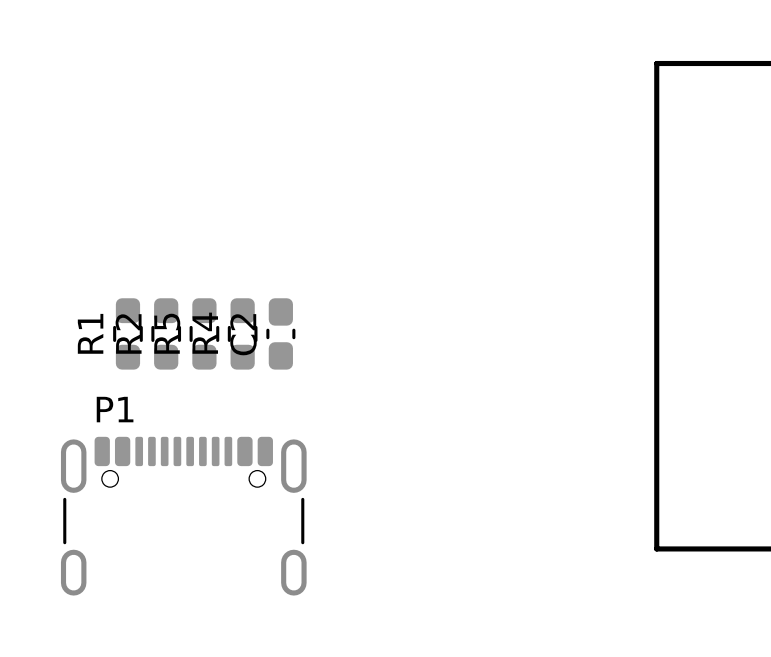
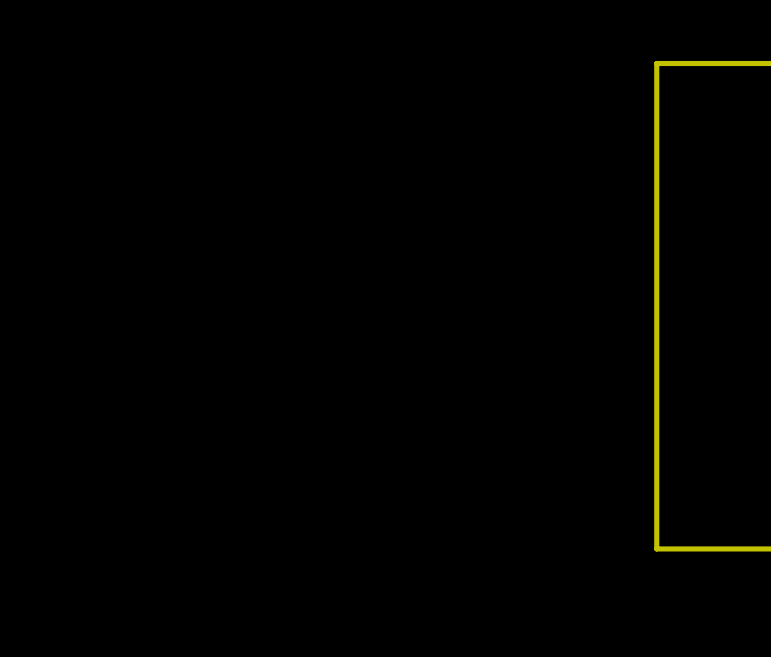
R1: (127, 333) -> none
R2: (166, 333) -> none
R5: (204, 333) -> none
R4: (242, 333) -> none
C2: (280, 333) -> none
P1: (183, 516) -> none

